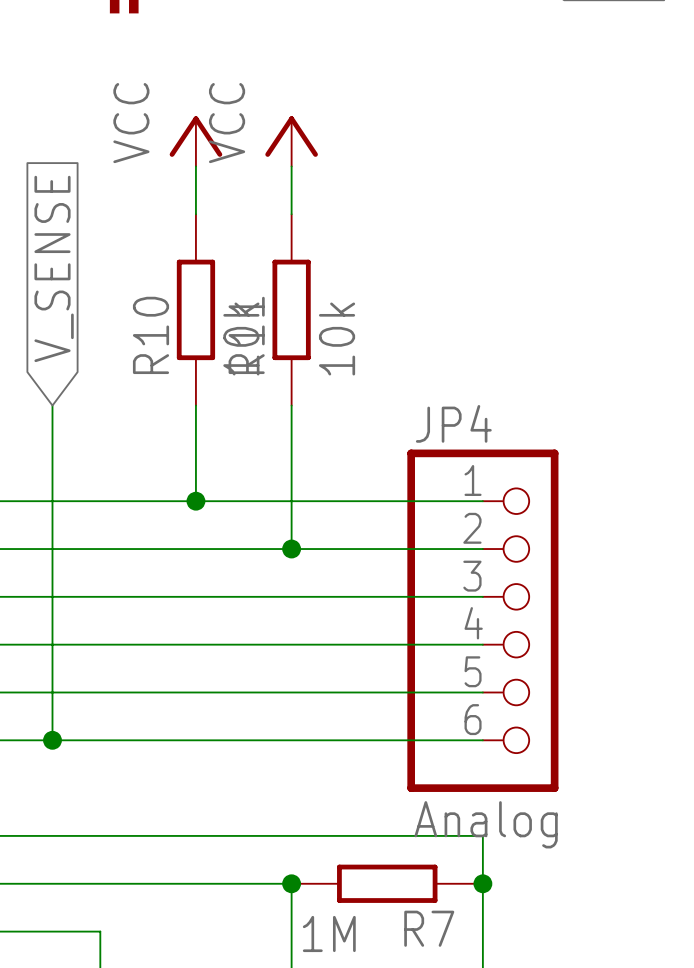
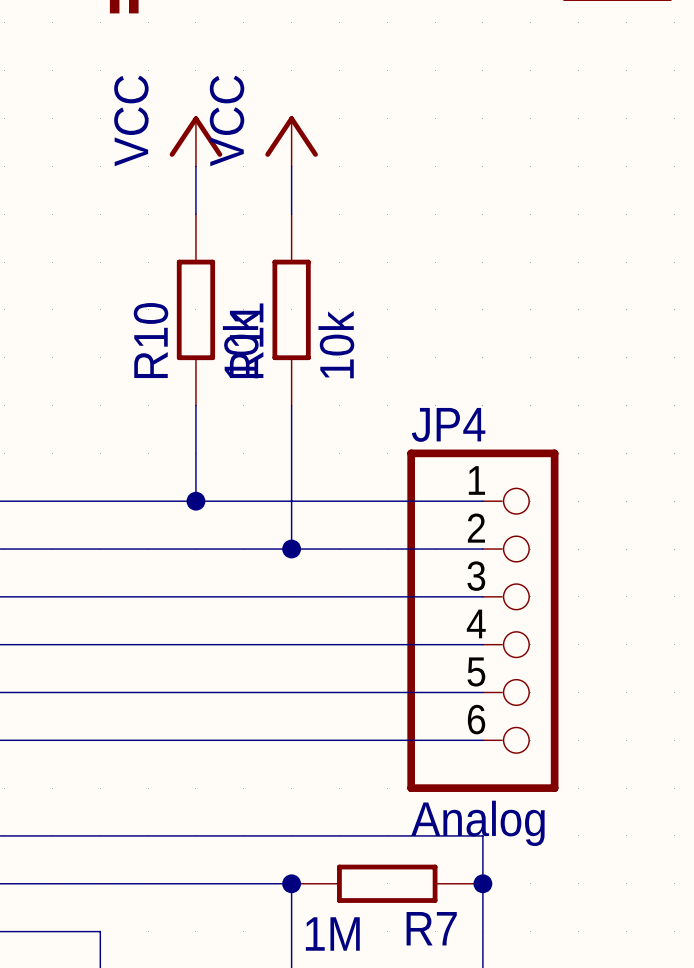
global label: V_SENSE (54, 268) -> none
wire: (52, 405) (52, 740) -> none
junction: (52, 740) -> none

